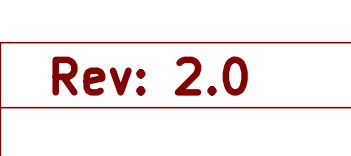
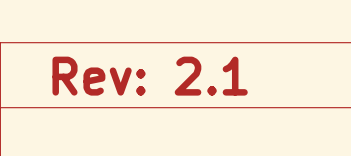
title block: Rev: 2.0 (150, 76) -> Rev: 2.1 (150, 76)

